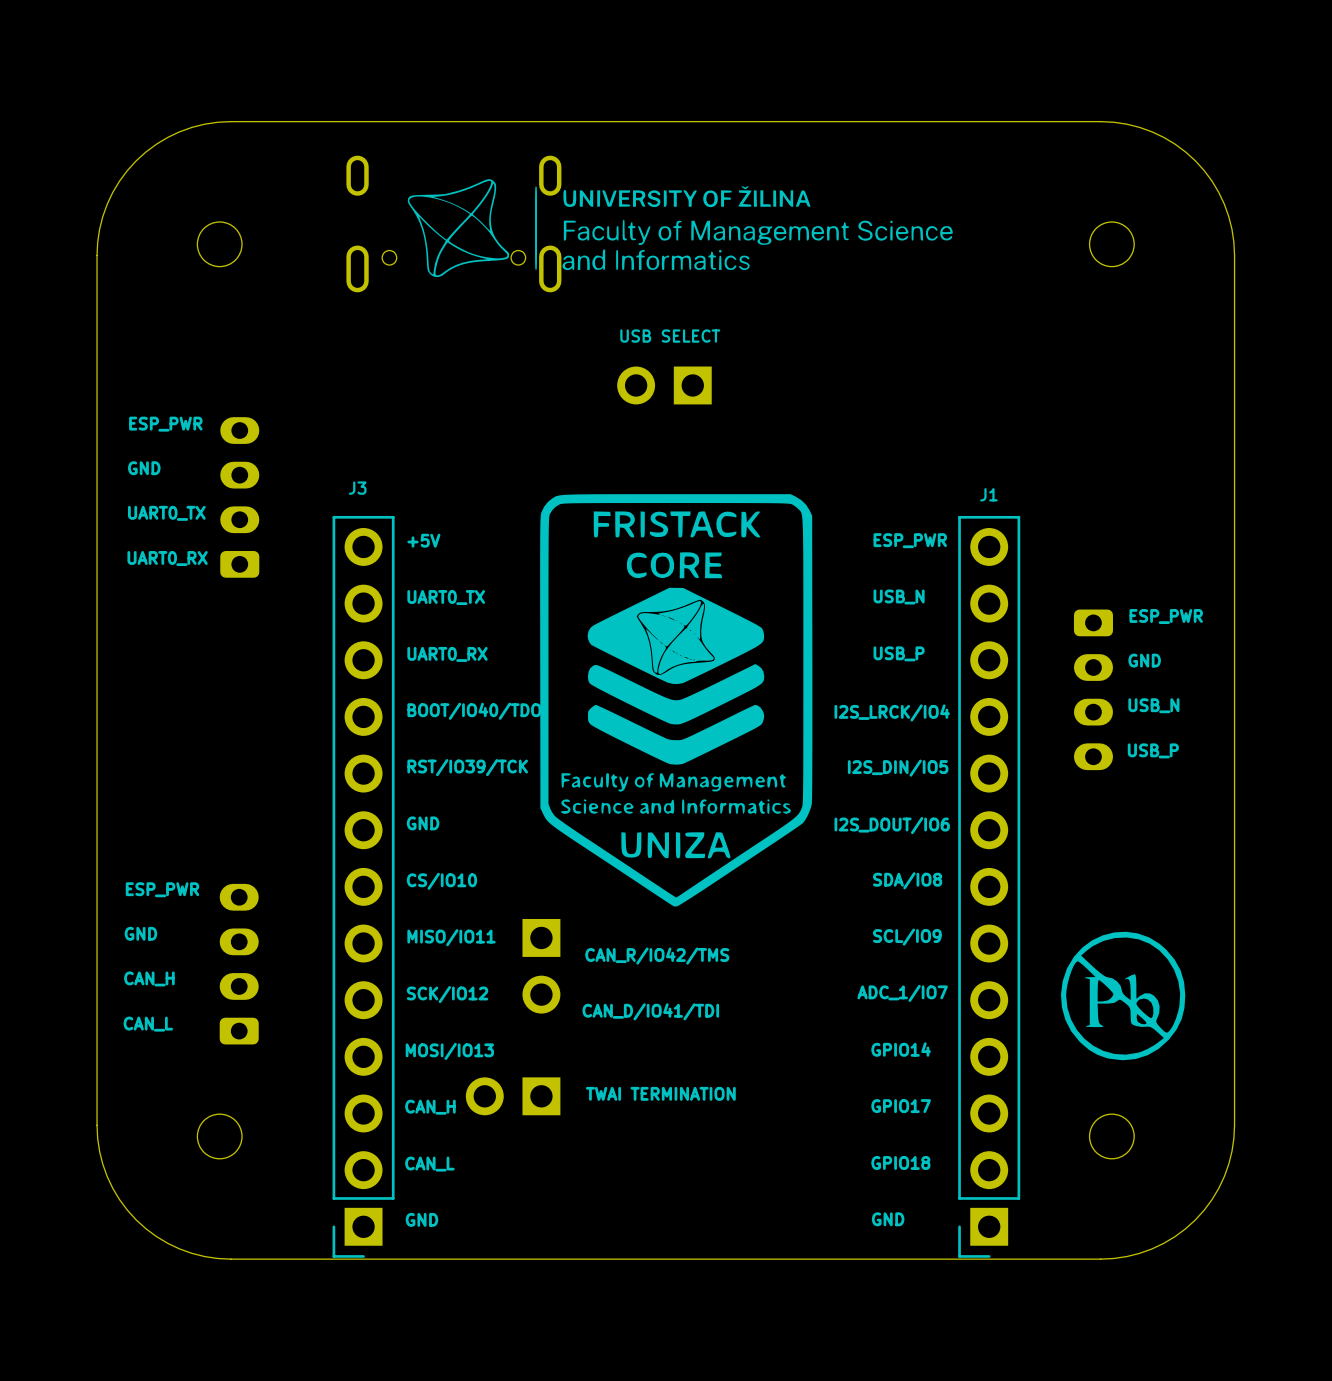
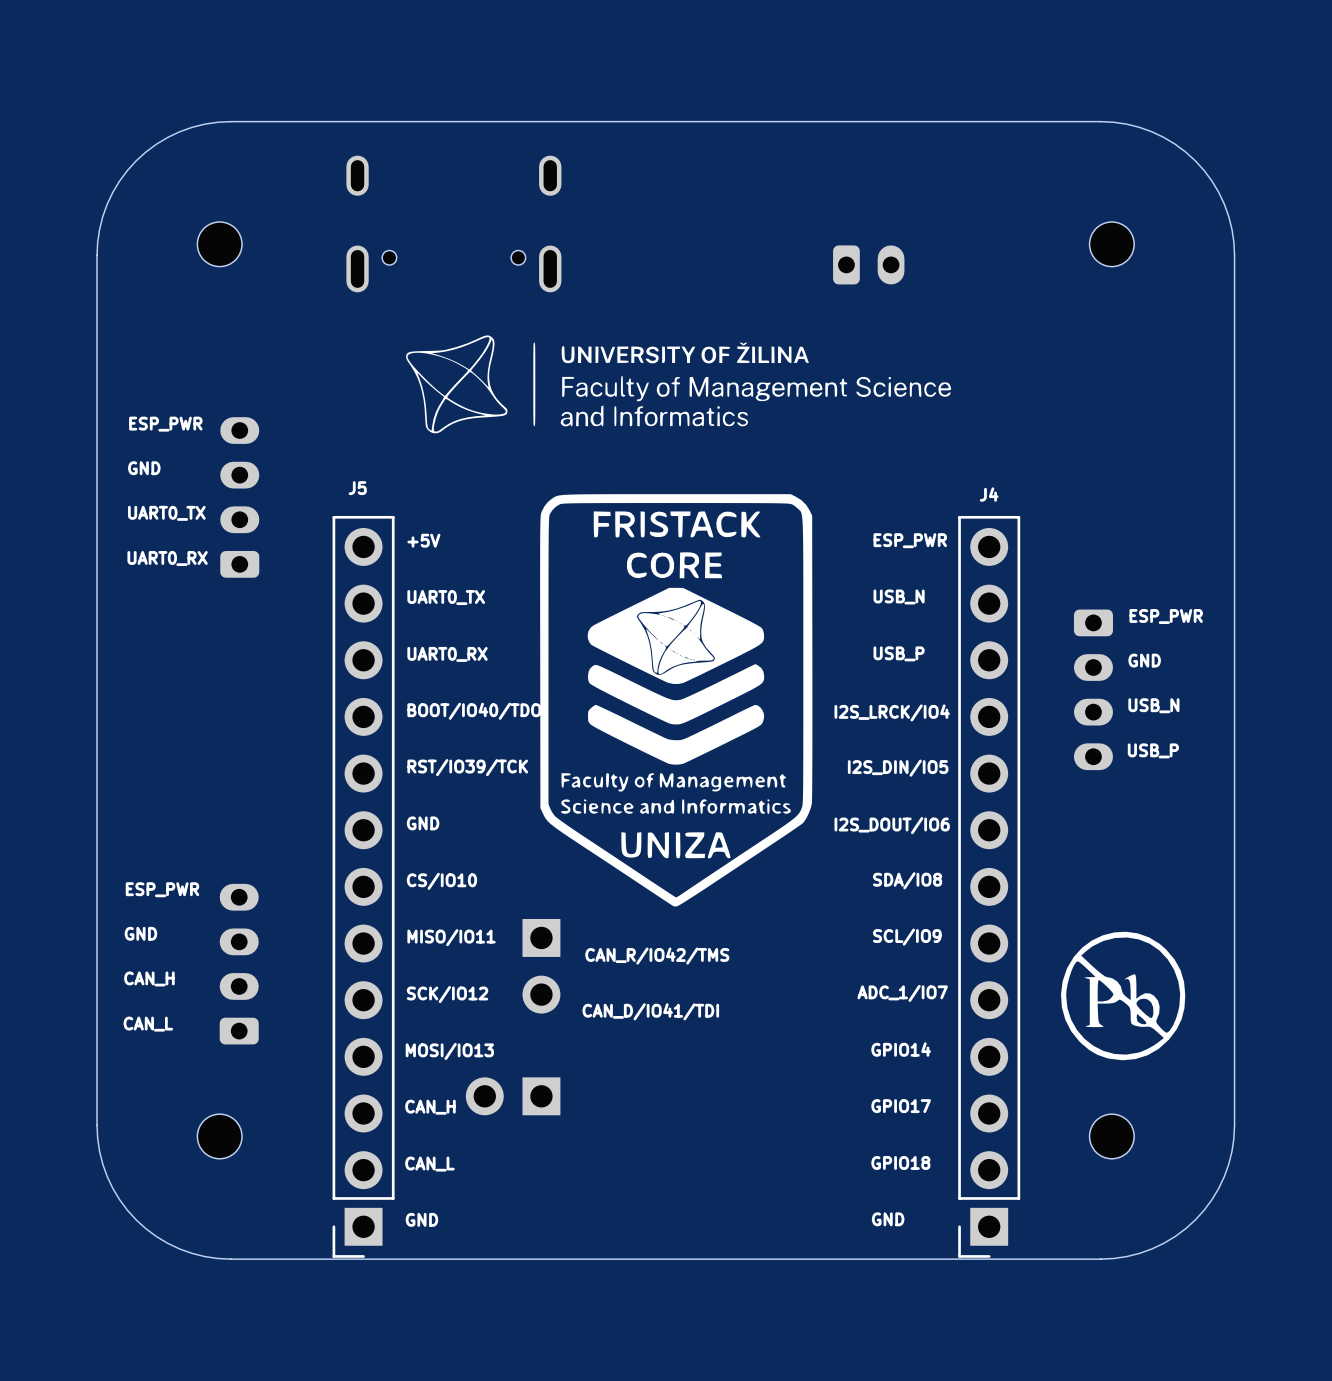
drawing position: (680, 228) -> (678, 384)
part: none -> (868, 264)
text: USB SELECT (670, 336) -> none
part: (664, 385) -> none
J3 name: J3 (357, 488) -> J5 (357, 488)
J1 name: J1 (988, 494) -> J4 (989, 494)
text: TWAI TERMINATION (660, 1093) -> none

